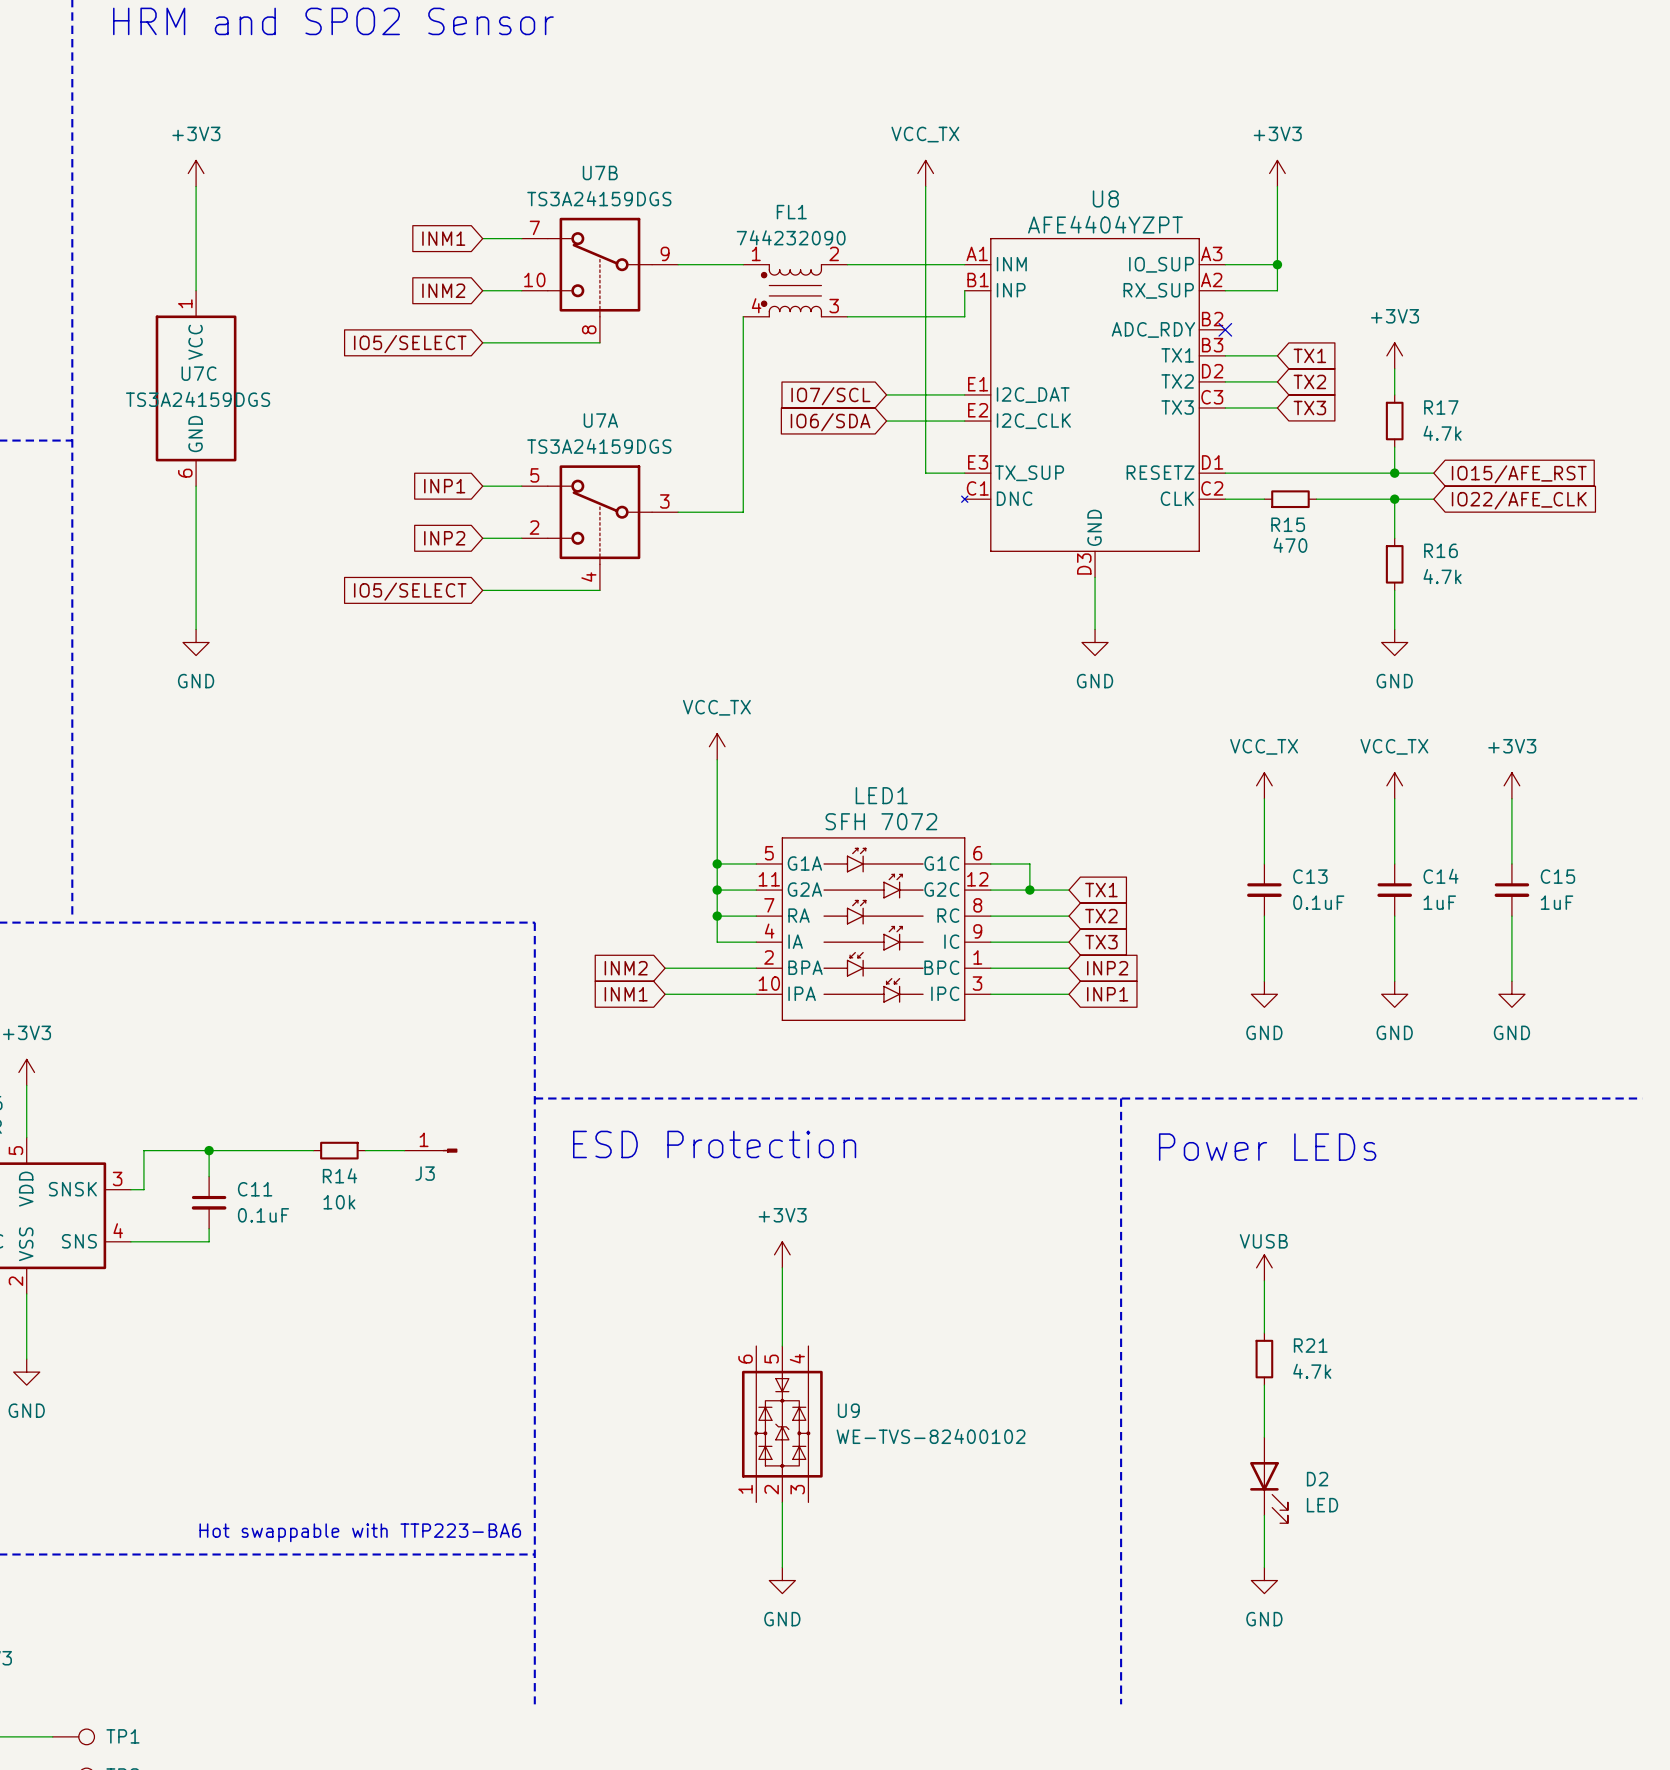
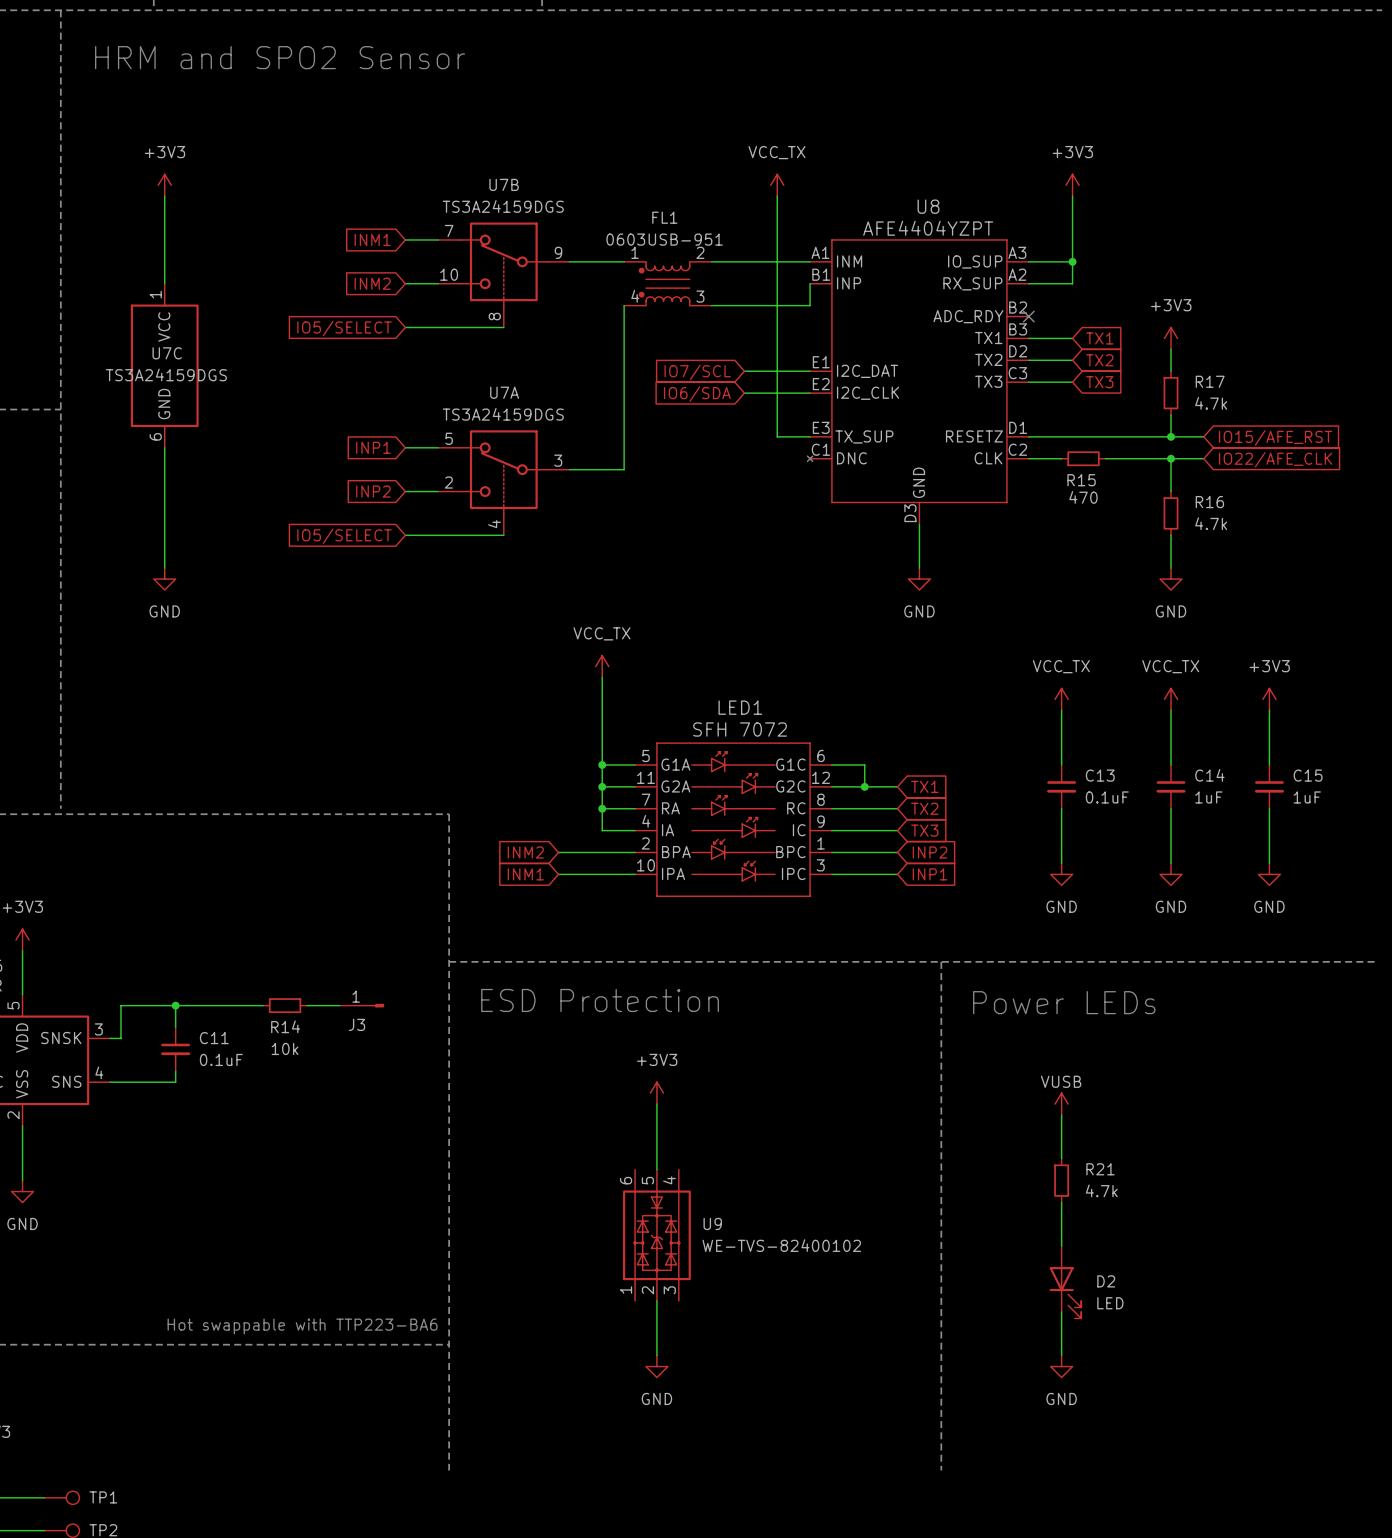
FL1 value: 744232090 (791, 237) -> 0603USB-951 (664, 239)

